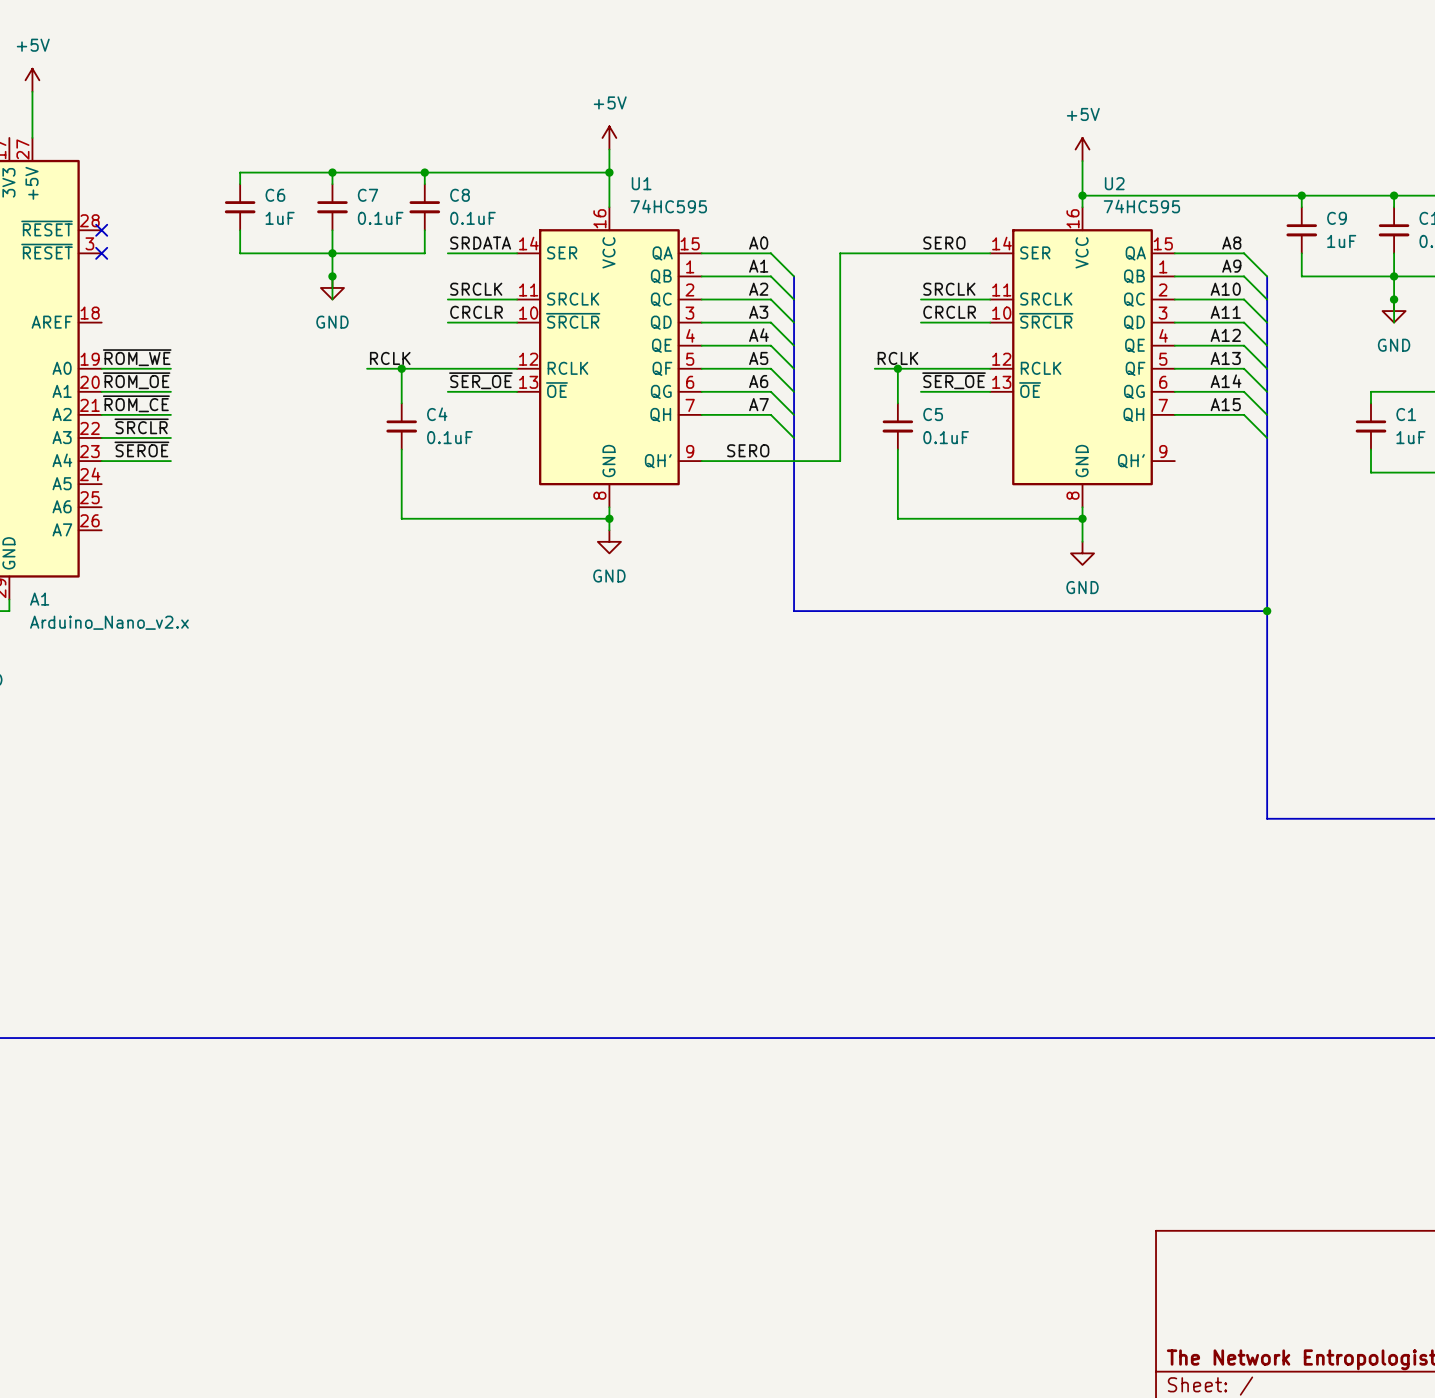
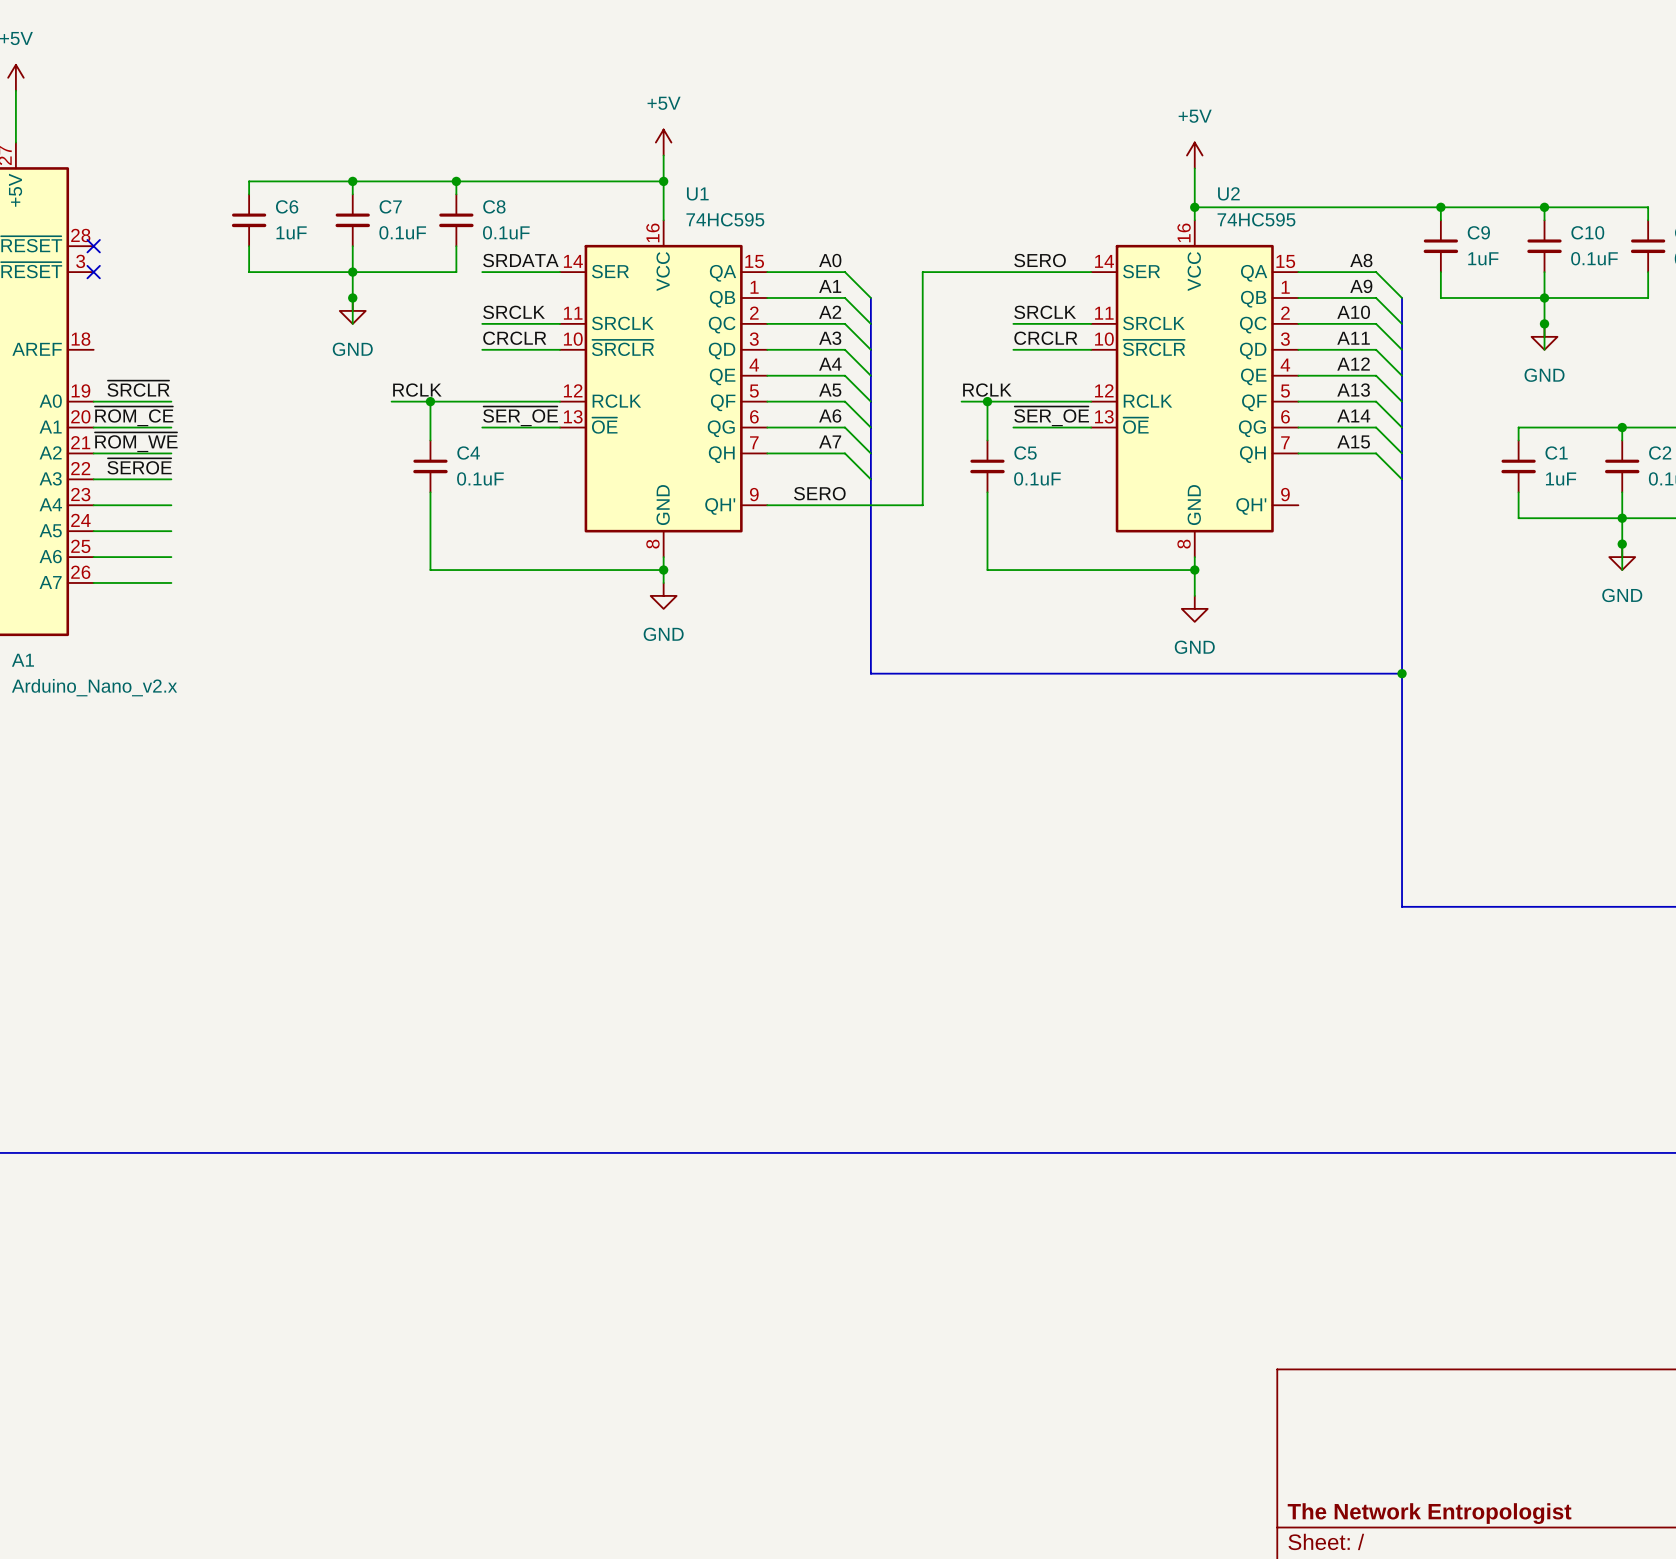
label: ~{ROM_WE} (137, 357) -> none
label: none -> ~{SRCLR} (138, 388)
label: ~{ROM_OE} (136, 380) -> ~{ROM_CE} (134, 416)
label: ~{ROM_CE} (136, 403) -> ~{ROM_WE} (136, 442)
label: ~{SRCLR} (141, 426) -> ~{SEROE} (139, 466)
label: ~{SEROE} (141, 449) -> none
wire: none -> (93, 531) (171, 531)
wire: none -> (93, 557) (171, 557)
wire: none -> (93, 582) (171, 582)

